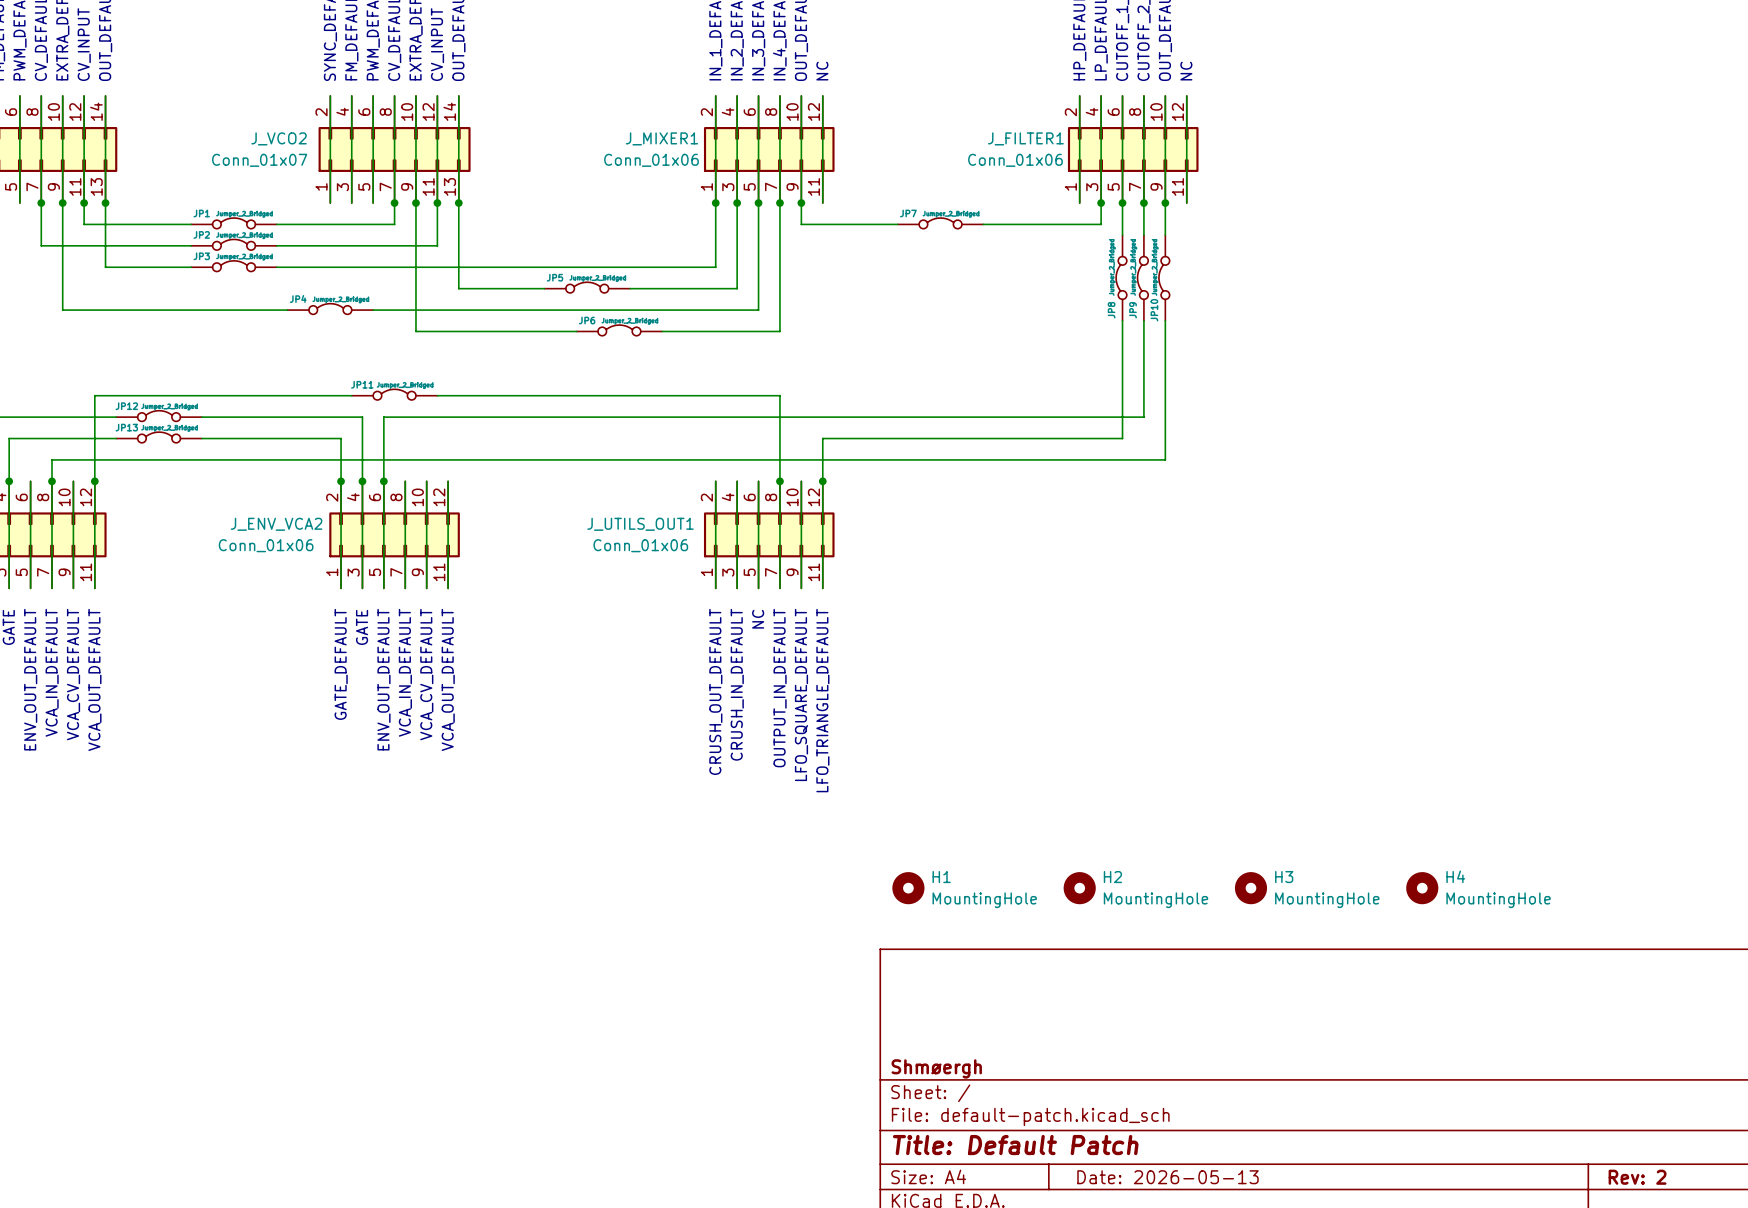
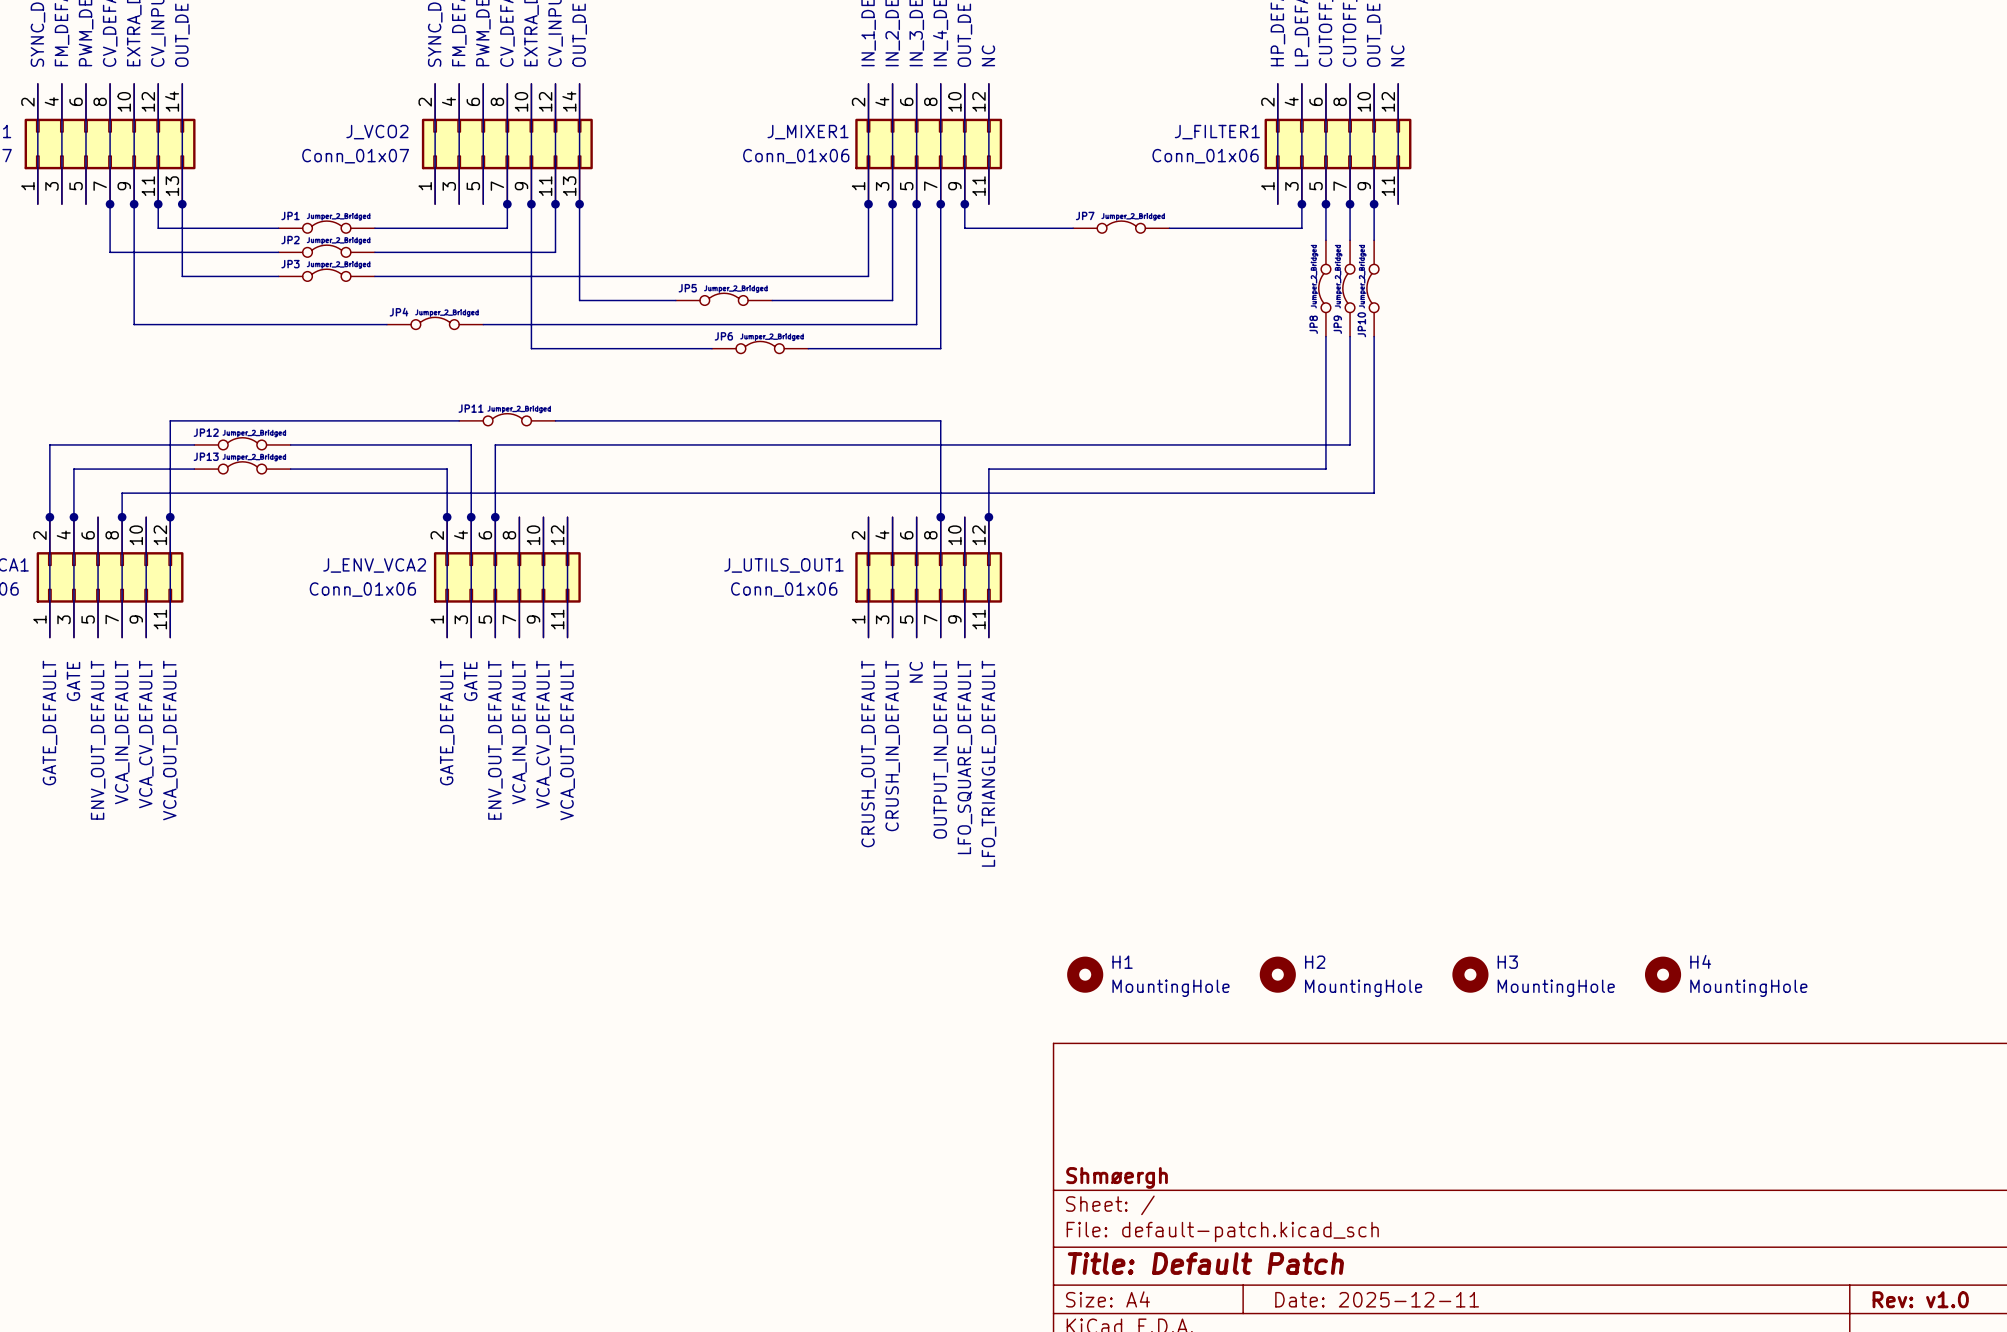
title block: Date: 2026-05-13 (1168, 1177) -> Date: 2025-12-11 (1377, 1299)
title block: Rev: 2 (1637, 1177) -> Rev: v1.0 (1920, 1299)

